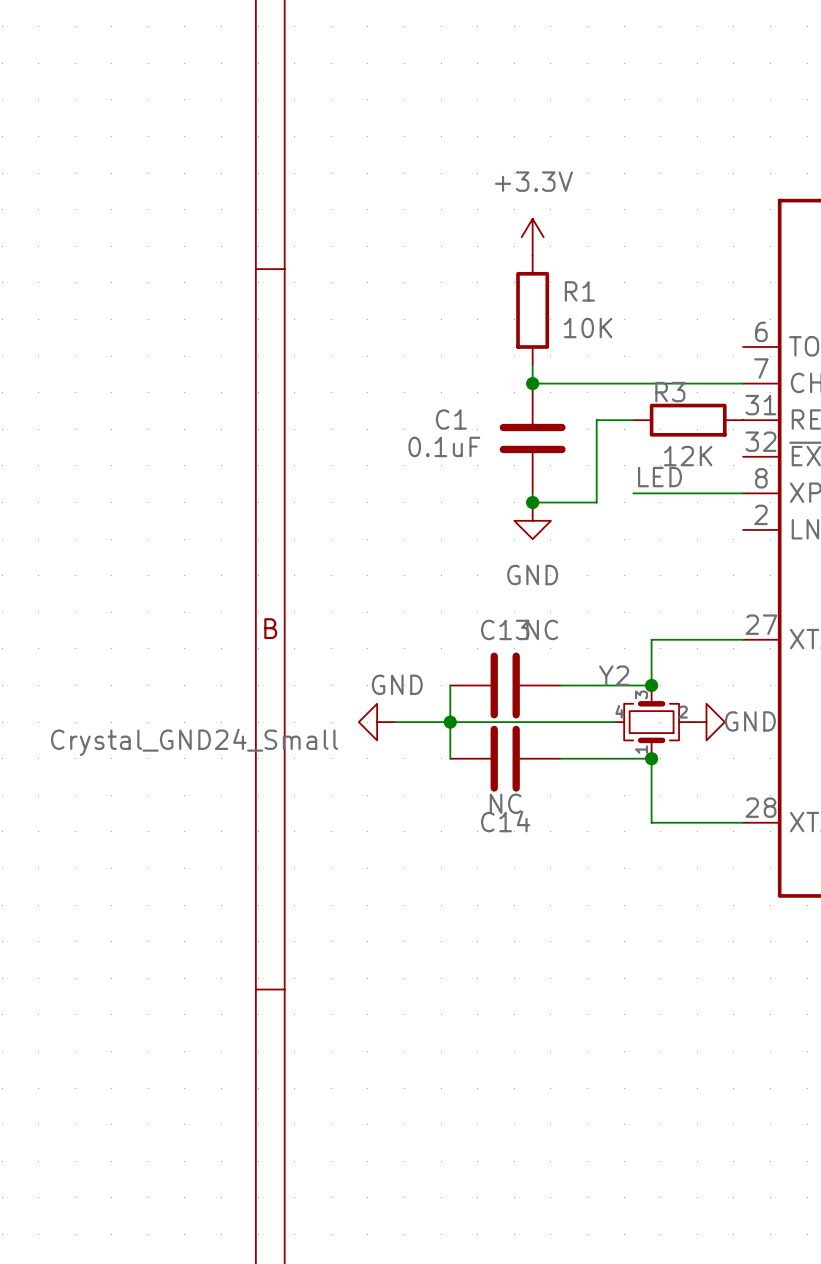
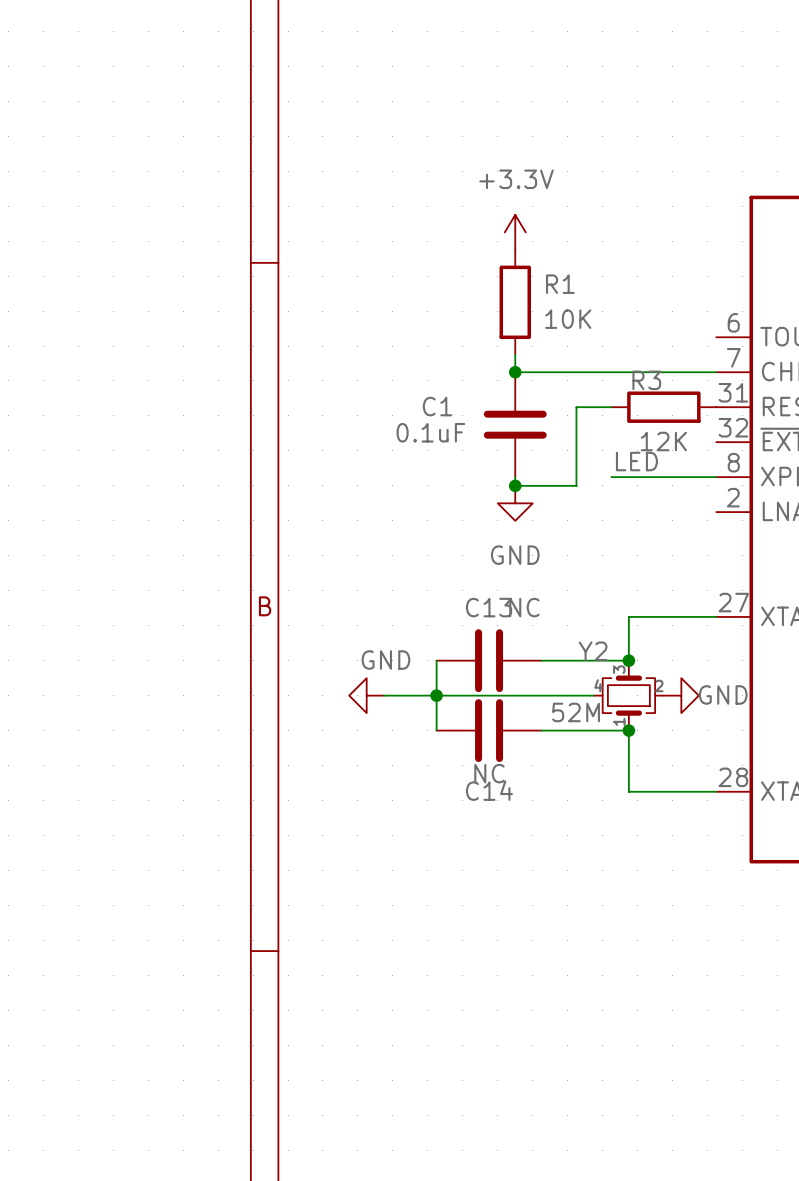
Y2 value: Crystal_GND24_Small (194, 742) -> 52M (576, 712)

